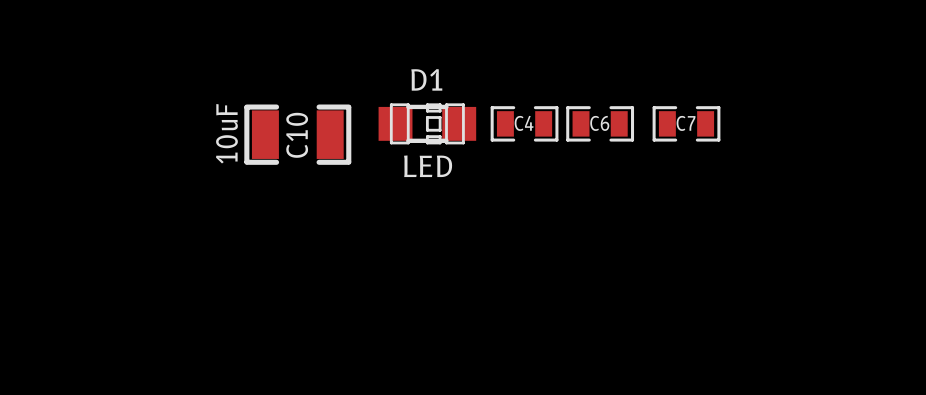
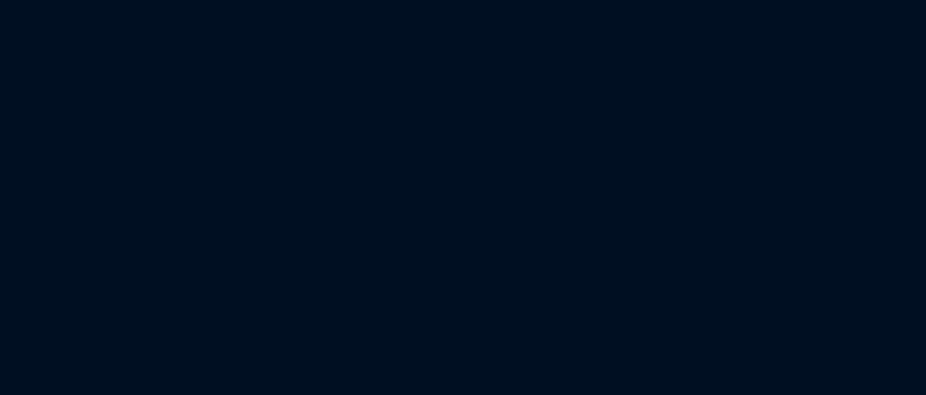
D1: LED (427, 123) -> none
C4: (524, 123) -> none
C6: (600, 123) -> none
C7: (686, 123) -> none
C10: 10uF (297, 134) -> none

